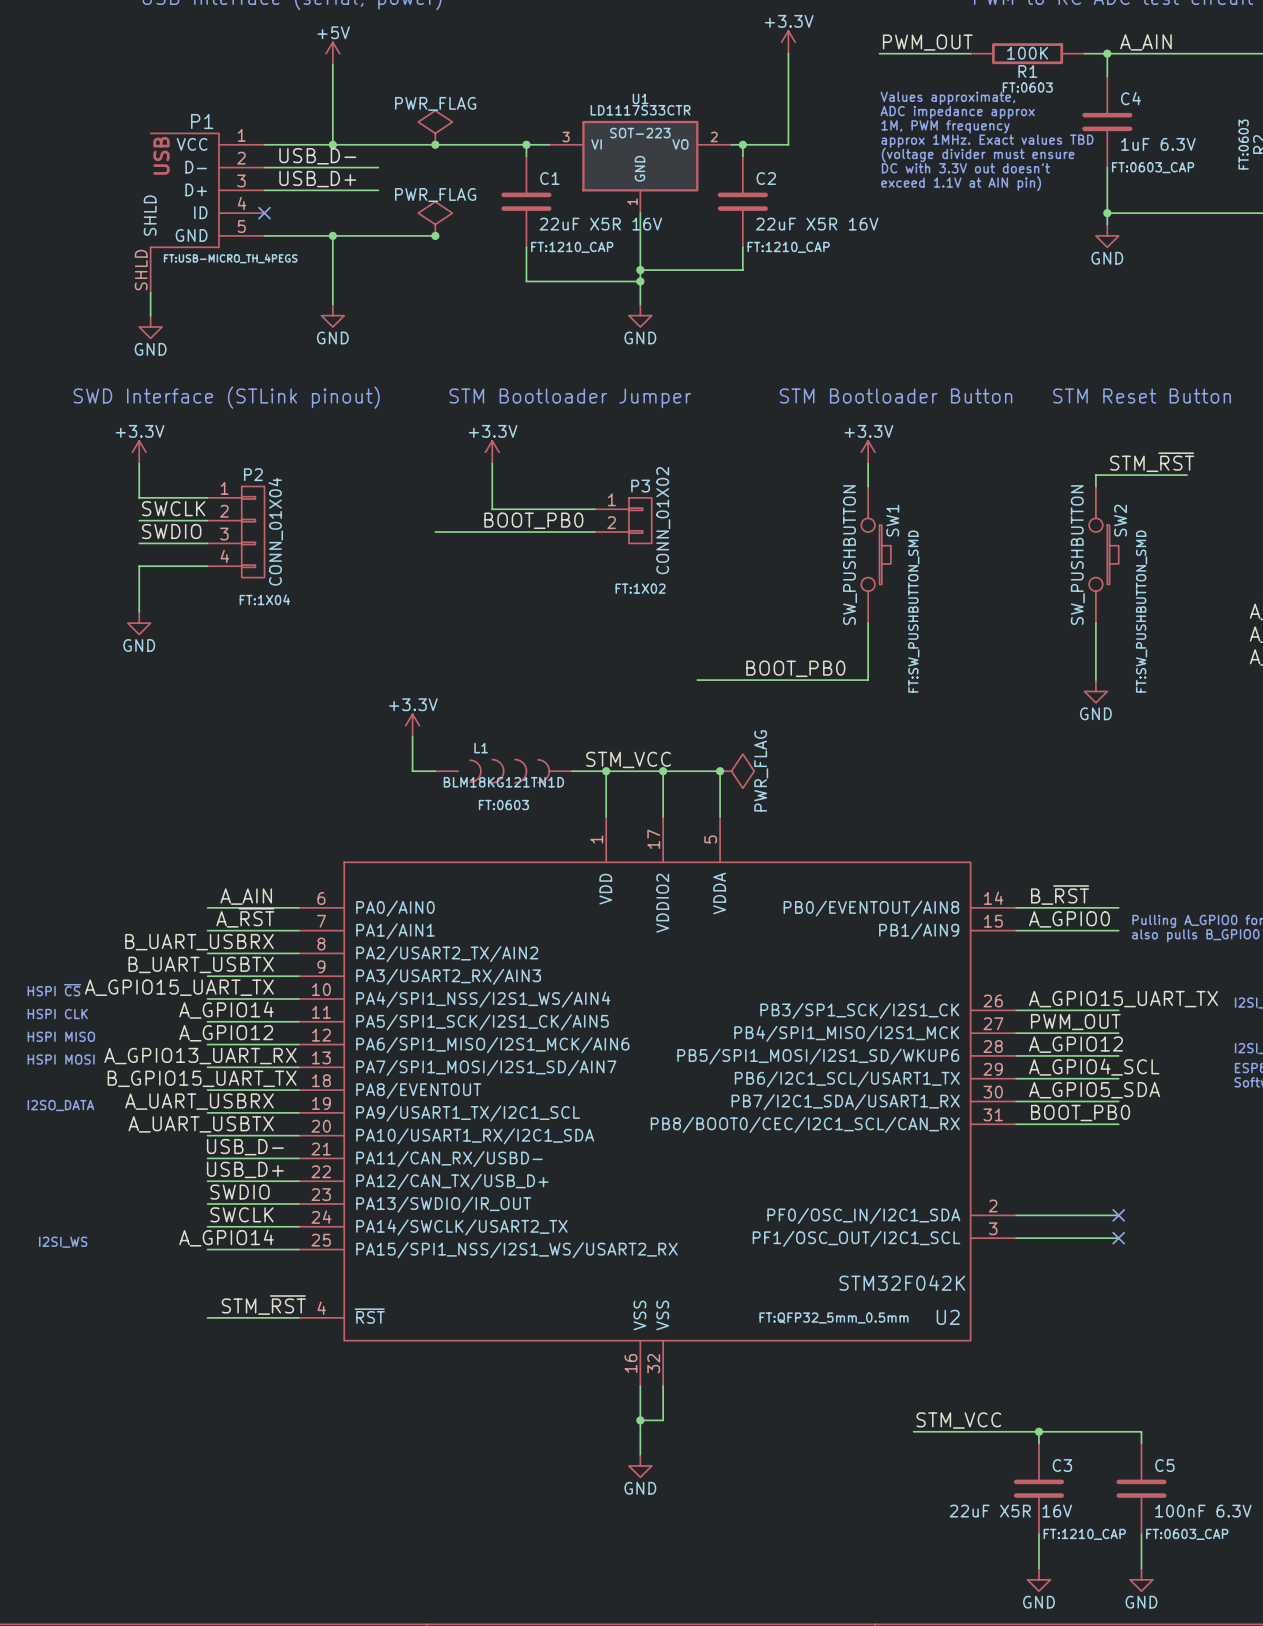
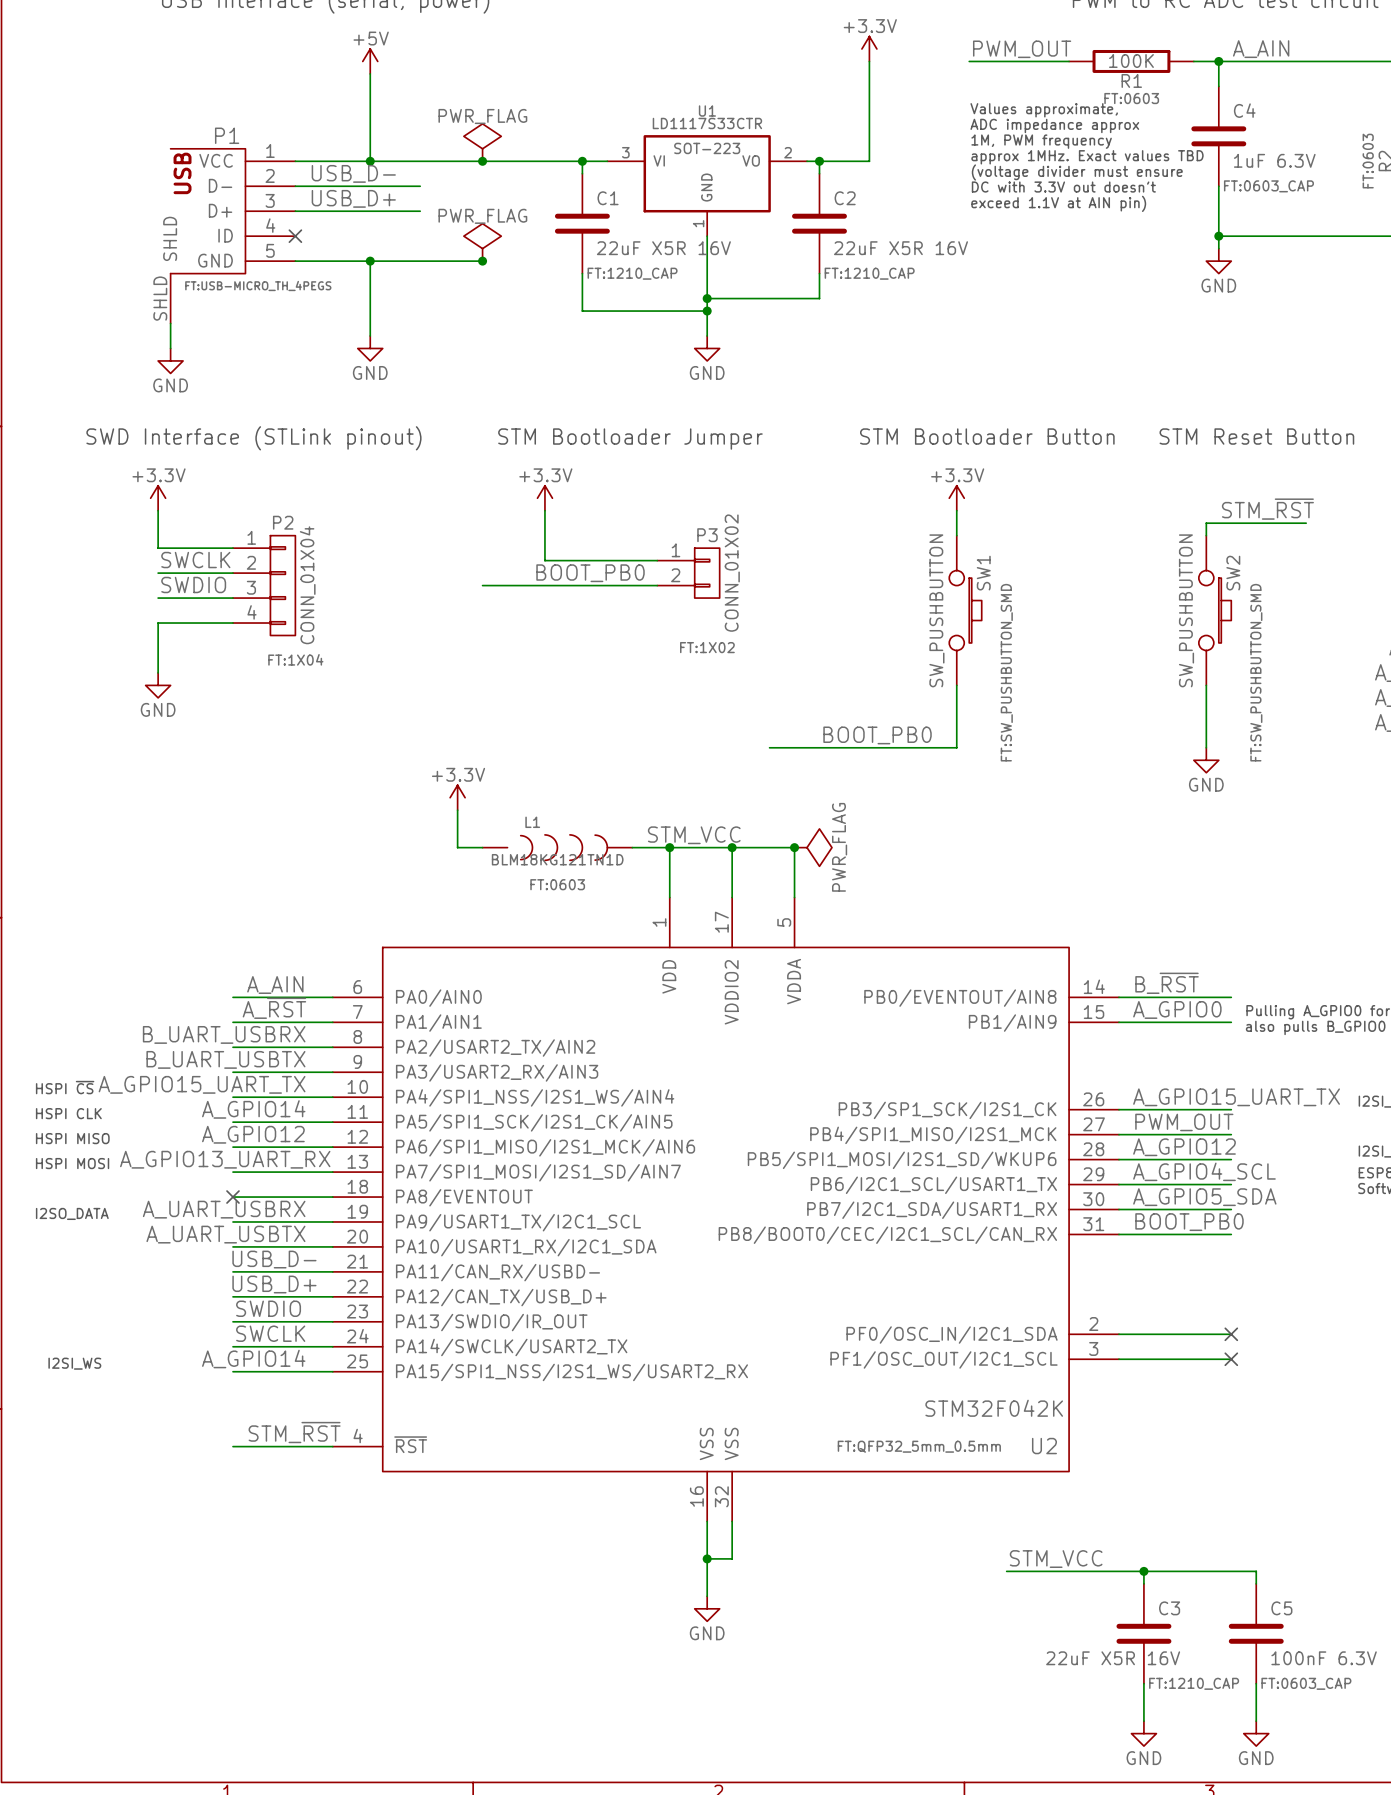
label: B_GPIO15_UART_TX (202, 1078) -> none
no-connect mark: none -> (232, 1197)

